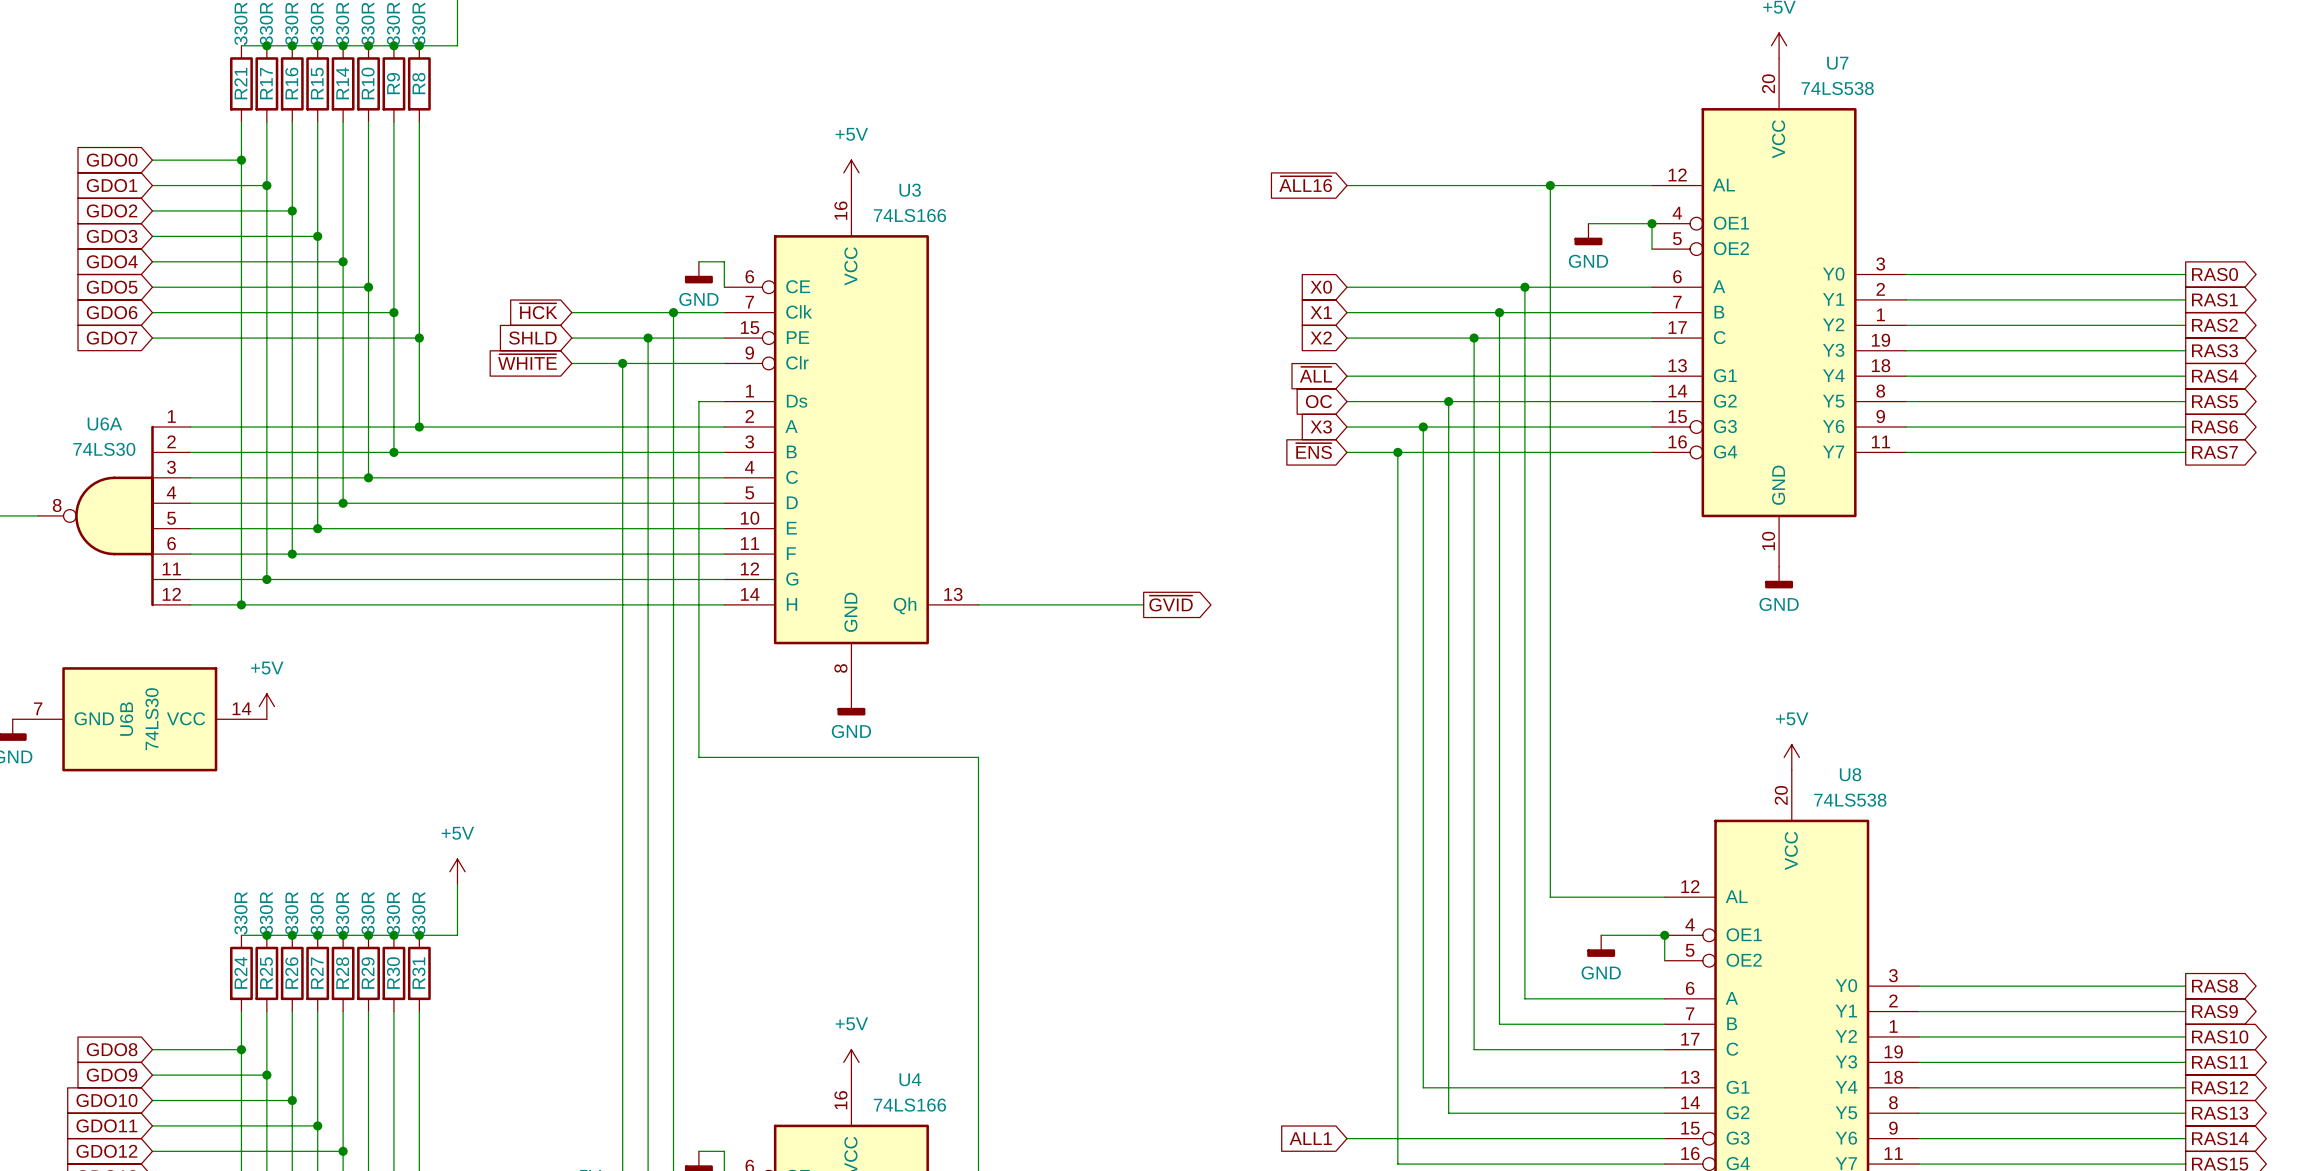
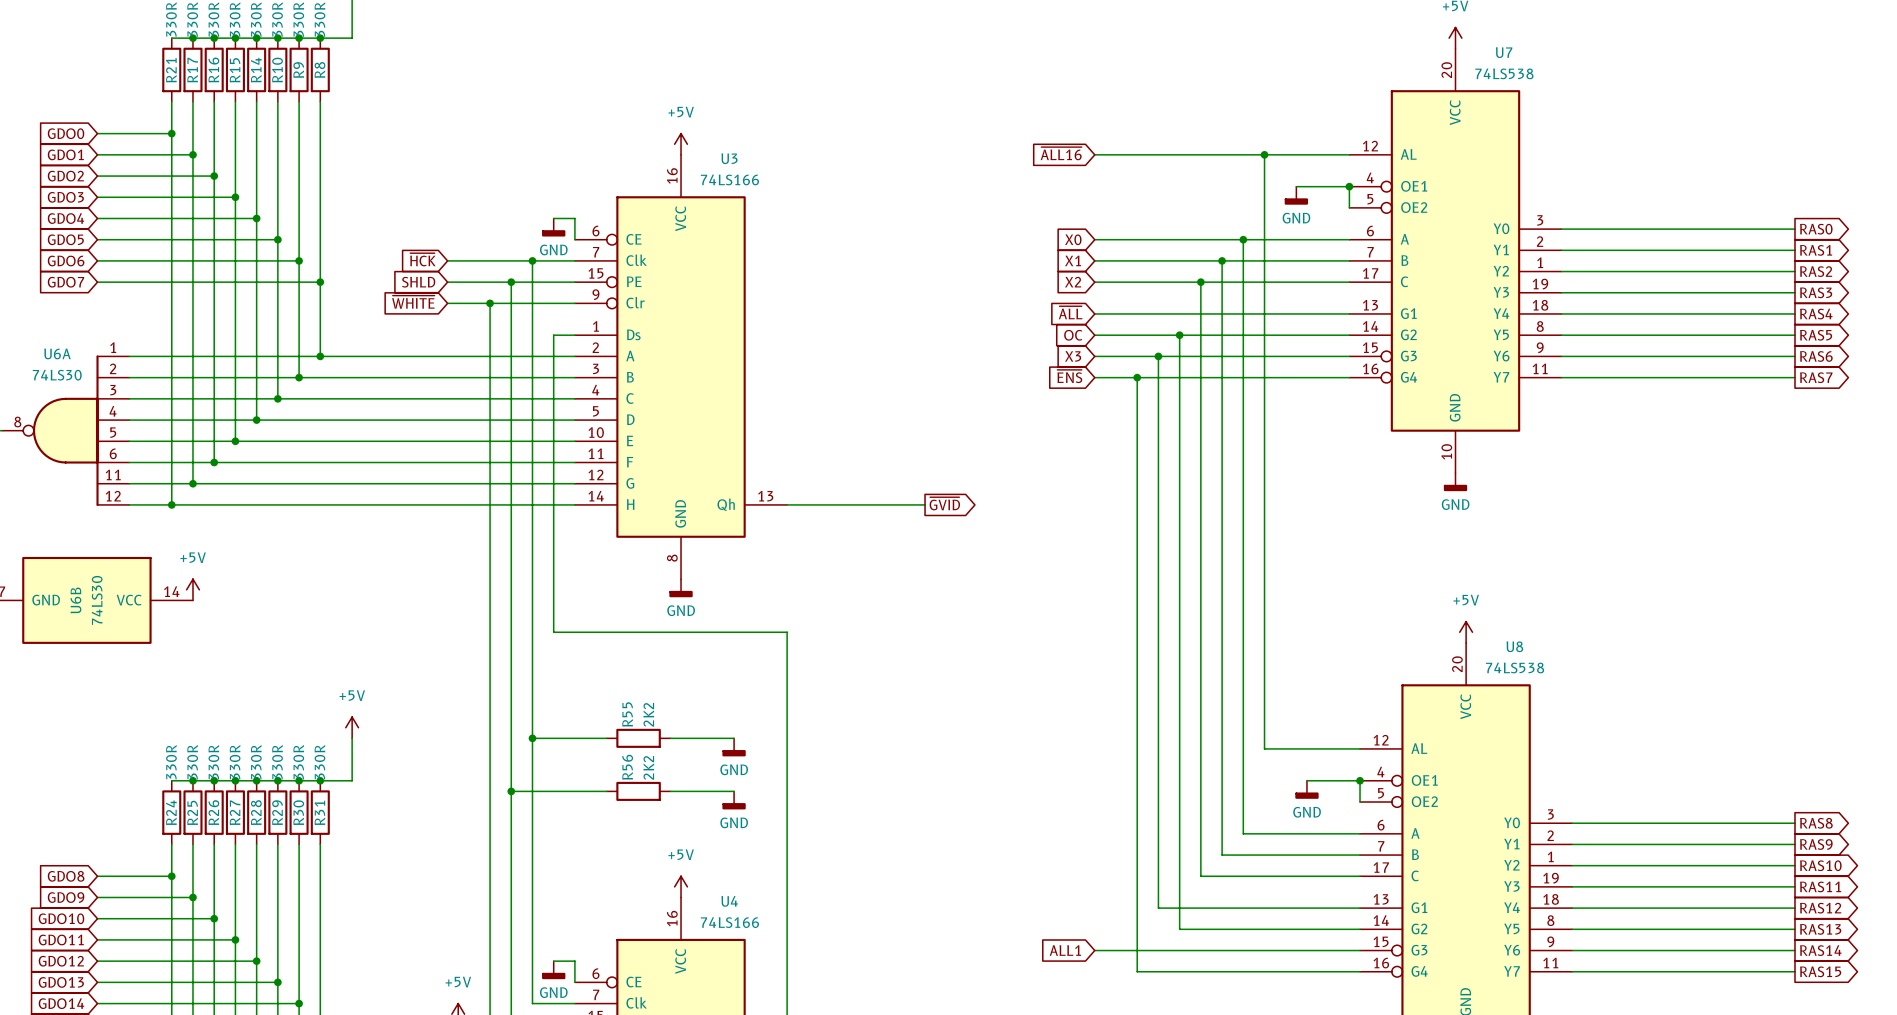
wire: none -> (532, 738) (606, 738)
junction: none -> (532, 738)
R55: none -> 2K2 (638, 738)
wire: none -> (670, 738) (734, 738)
power symbol: none -> GND (734, 747)
wire: none -> (511, 791) (606, 791)
junction: none -> (511, 791)
R56: none -> 2K2 (638, 791)
wire: none -> (670, 791) (734, 791)
power symbol: none -> GND (734, 800)

